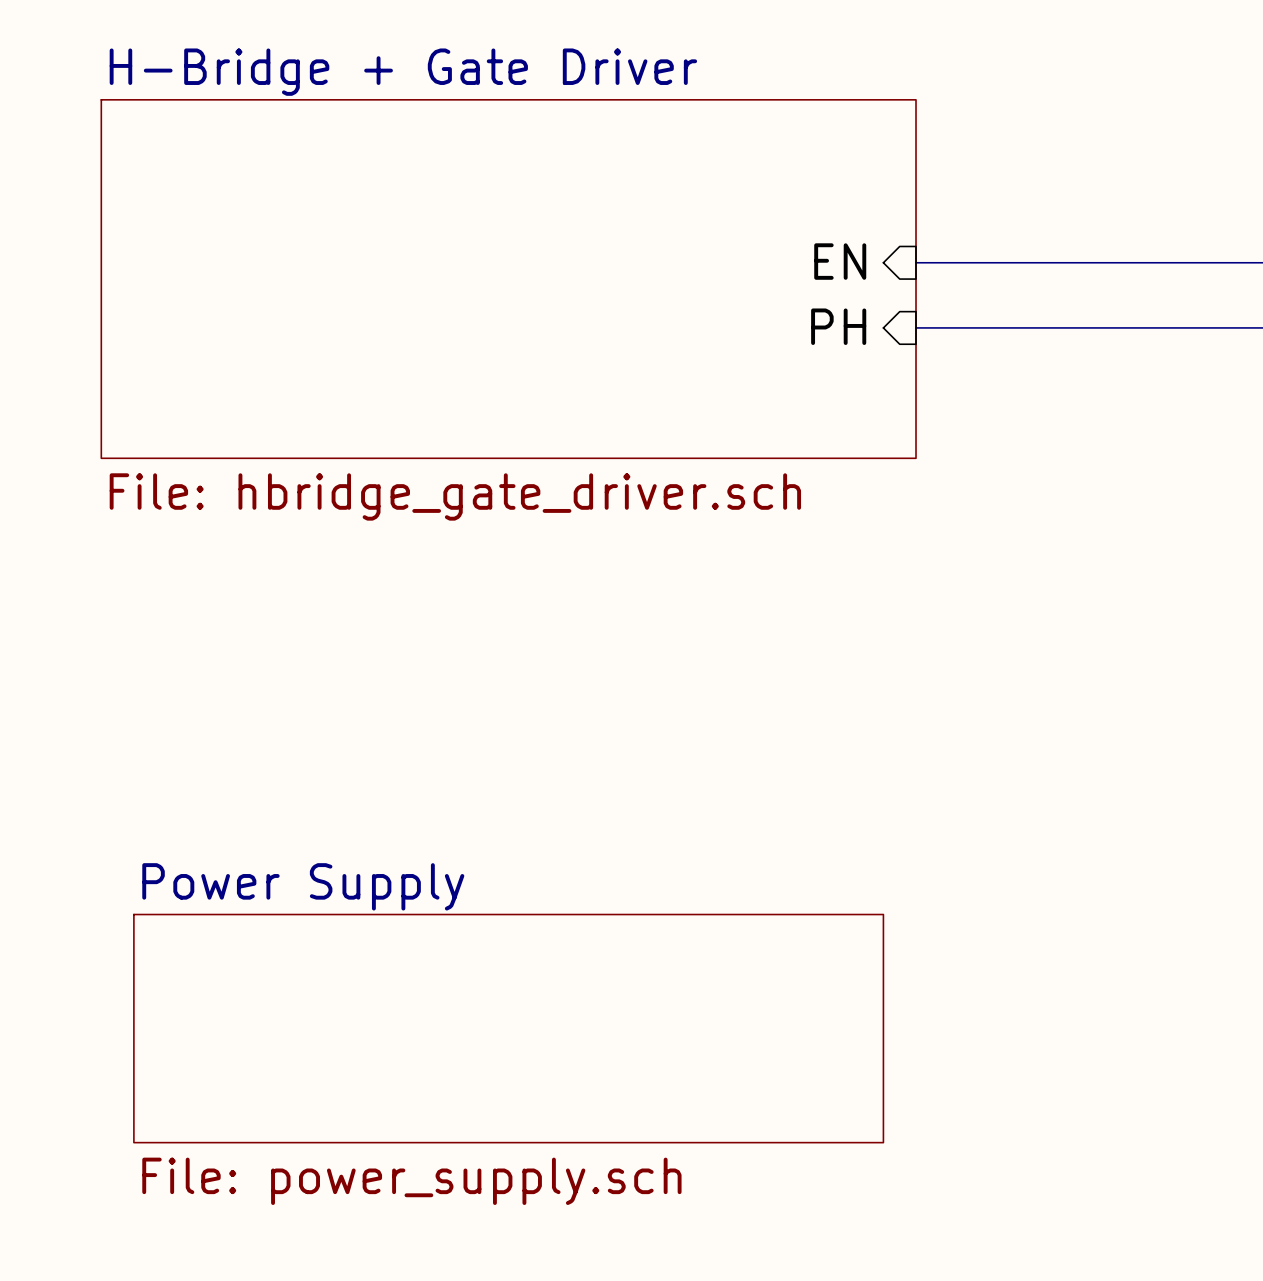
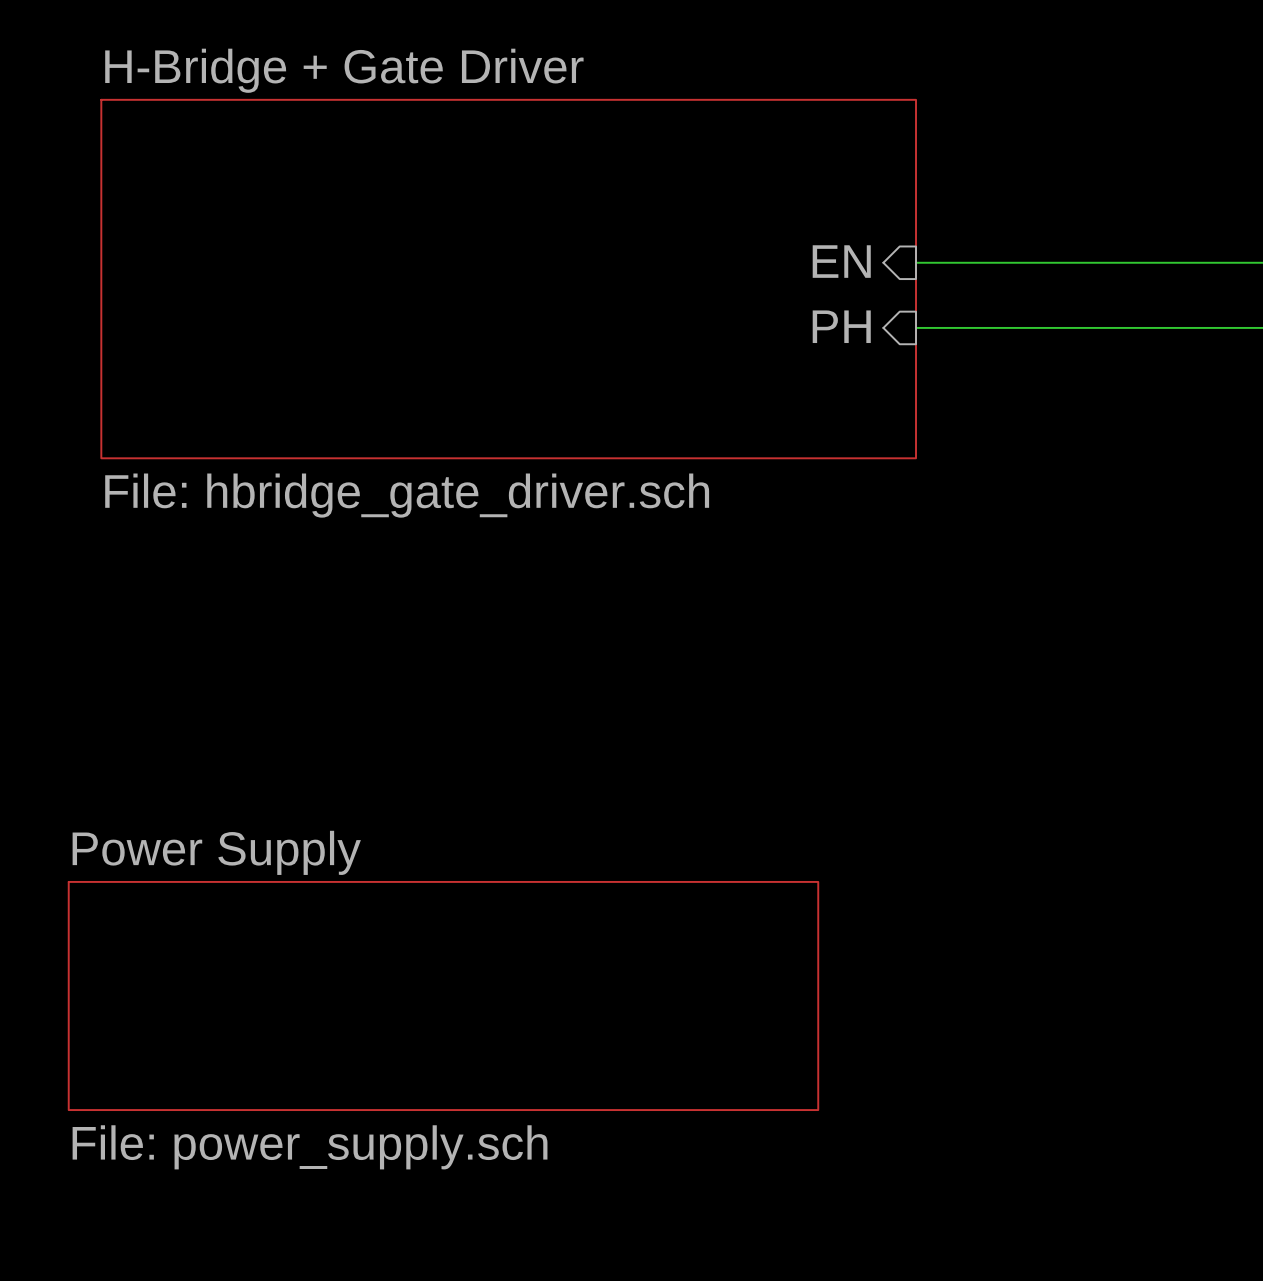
sheet Power Supply position: (508, 1028) -> (443, 995)

